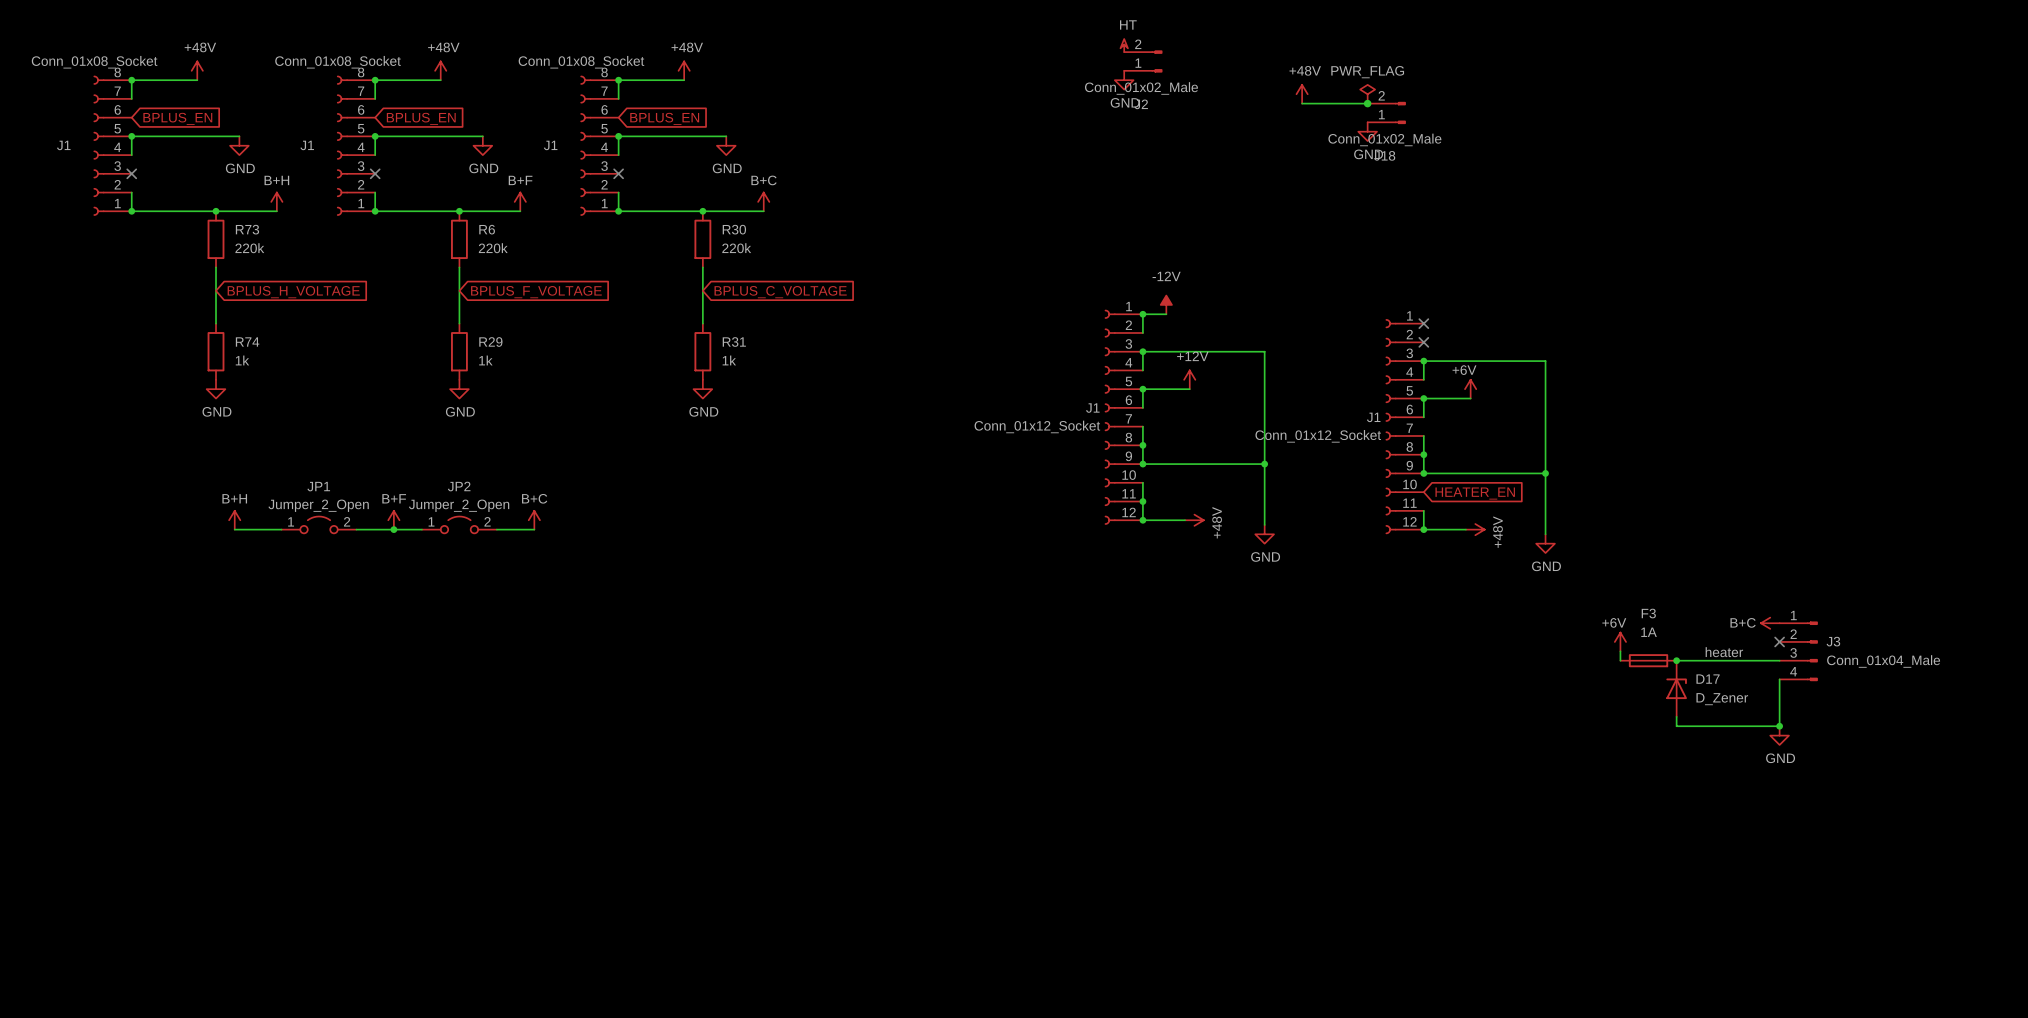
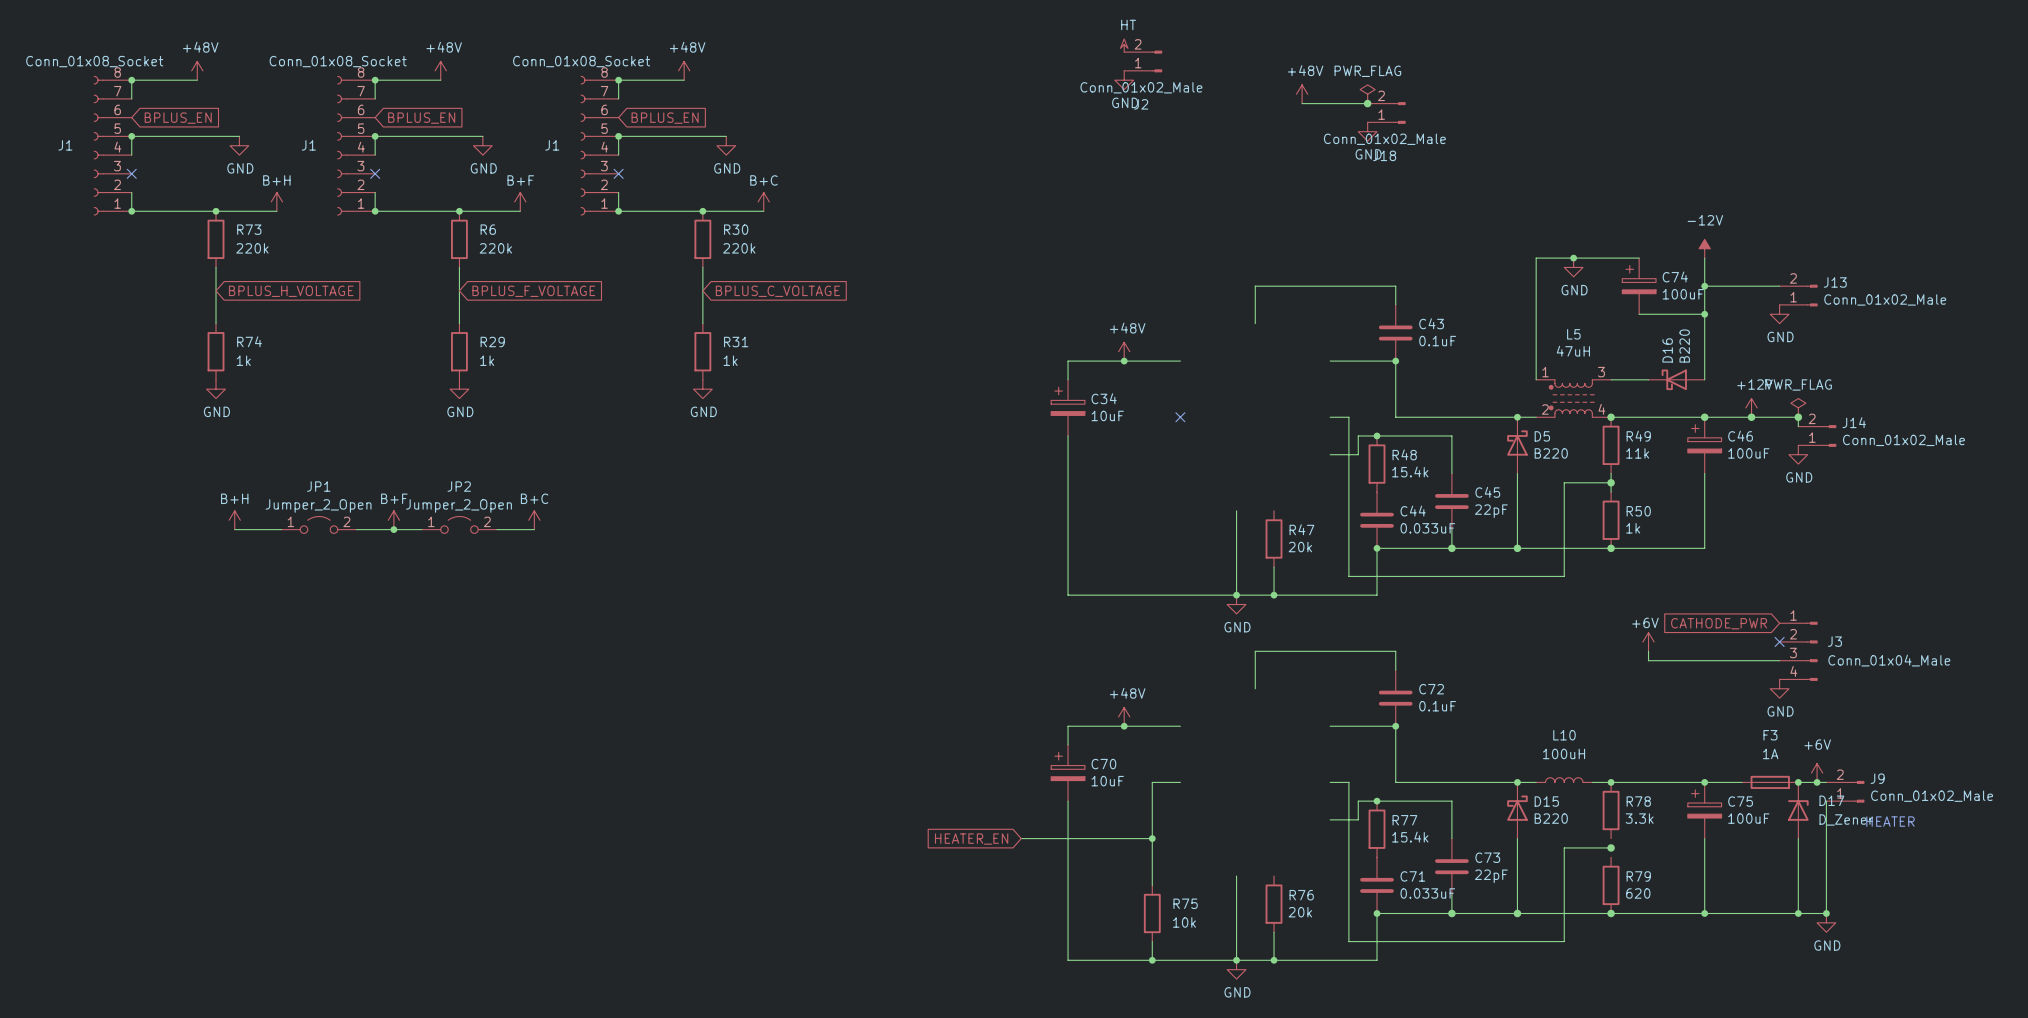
power symbol: none -> -12V (1704, 248)
junction: none -> (1573, 258)
wire: none -> (1639, 258) (1536, 258) (1536, 379)
wire: none -> (1704, 258) (1704, 379)
power symbol: none -> GND (1573, 267)
C74: none -> 100uF (1639, 286)
wire: none -> (1704, 286) (1779, 286)
junction: none -> (1704, 286)
J13: none -> Conn_01x02_Male (1798, 295)
power symbol: -12V (1166, 304) -> none
wire: none -> (1395, 304) (1395, 286) (1255, 286) (1255, 323)
junction: (1142, 314) -> none
wire: (1166, 314) (1142, 314) (1142, 332) -> none
wire: none -> (1639, 314) (1704, 314)
junction: none -> (1704, 314)
power symbol: none -> GND (1779, 314)
no-connect mark: (1423, 323) -> none
C43: none -> 0.1uF (1395, 332)
no-connect mark: (1423, 342) -> none
power symbol: none -> +48V (1124, 351)
junction: (1142, 351) -> none
junction: none -> (1124, 361)
wire: none -> (1180, 361) (1068, 361) (1068, 379)
wire: none -> (1330, 361) (1395, 361) (1395, 417) (1536, 417)
junction: none -> (1395, 361)
junction: (1423, 361) -> none
wire: (1142, 370) (1142, 351) (1264, 351) (1264, 524) -> none
power symbol: +12V (1189, 379) -> none
wire: (1423, 379) (1423, 361) (1545, 361) (1545, 534) -> none
wire: none -> (1611, 379) (1648, 379)
D16: none -> B220 (1676, 379)
junction: (1142, 389) -> none
wire: (1189, 389) (1142, 389) (1142, 407) -> none
power symbol: +6V (1470, 389) -> none
junction: (1423, 398) -> none
wire: (1470, 398) (1423, 398) (1423, 417) -> none
L5: none -> 47uH (1573, 398)
C34: none -> 10uF (1068, 407)
power symbol: none -> +12V (1751, 407)
power symbol: none -> PWR_FLAG (1798, 407)
J1: Conn_01x12_Socket (1123, 417) -> none
no-connect mark: none -> (1180, 417)
wire: none -> (1330, 417) (1348, 417) (1348, 576) (1564, 576) (1564, 482) (1611, 482)
junction: none -> (1517, 417)
wire: none -> (1611, 417) (1798, 417) (1798, 426)
junction: none -> (1611, 417)
junction: none -> (1704, 417)
junction: none -> (1751, 417)
junction: none -> (1798, 417)
wire: (1142, 426) (1142, 464) (1264, 464) -> none
J1: Conn_01x12_Socket (1404, 426) -> none
wire: none -> (1068, 435) (1068, 595) (1377, 595) (1377, 548) (1704, 548) (1704, 473)
junction: none -> (1377, 435)
wire: (1423, 435) (1423, 473) (1545, 473) -> none
J14: none -> Conn_01x02_Male (1817, 435)
junction: (1142, 445) -> none
D5: none -> B220 (1517, 445)
R49: none -> 11k (1611, 445)
C46: none -> 100uF (1704, 445)
wire: none -> (1330, 454) (1358, 454) (1358, 435) (1451, 435) (1451, 473)
junction: (1423, 454) -> none
power symbol: none -> GND (1798, 454)
junction: (1142, 464) -> none
junction: (1264, 464) -> none
R48: none -> 15.4k (1377, 464)
junction: (1423, 473) -> none
wire: none -> (1517, 473) (1517, 548)
junction: (1545, 473) -> none
wire: none -> (1611, 473) (1611, 492)
wire: (1142, 482) (1142, 520) (1185, 520) -> none
junction: none -> (1611, 482)
global label: HEATER_EN (1475, 493) -> none
junction: (1142, 501) -> none
C45: none -> 22pF (1451, 501)
wire: none -> (1236, 510) (1236, 595)
wire: (1423, 510) (1423, 529) (1465, 529) -> none
junction: (1142, 520) -> none
power symbol: +48V (1194, 520) -> none
C44: none -> 0.033uF (1377, 520)
R50: none -> 1k (1611, 520)
junction: (1423, 529) -> none
wire: none -> (1451, 529) (1451, 548)
power symbol: +48V (1475, 529) -> none
power symbol position: GND (1264, 534) -> GND (1236, 604)
R47: none -> 20k (1274, 538)
power symbol: GND (1545, 543) -> none
junction: none -> (1377, 548)
junction: none -> (1451, 548)
junction: none -> (1517, 548)
junction: none -> (1611, 548)
wire: none -> (1274, 567) (1274, 595)
junction: none -> (1236, 595)
junction: none -> (1274, 595)
power symbol: B+C (1770, 623) -> none
global label: none -> CATHODE_PWR (1719, 623)
power symbol position: +6V (1620, 641) -> +6V (1648, 641)
wire: (1620, 651) (1620, 660) -> none
label: heater (1724, 652) -> none
F3 position: (1648, 660) -> (1770, 782)
junction: (1676, 660) -> none
wire: none -> (1395, 670) (1395, 651) (1255, 651) (1255, 688)
wire: (1779, 679) (1779, 726) (1676, 726) (1676, 716) -> none
D17 position: (1676, 688) -> (1798, 810)
C72: none -> 0.1uF (1395, 698)
power symbol: none -> +48V (1124, 716)
junction: none -> (1124, 726)
wire: none -> (1180, 726) (1068, 726) (1068, 744)
wire: none -> (1330, 726) (1395, 726) (1395, 782) (1536, 782)
junction: none -> (1395, 726)
junction: (1779, 726) -> none
power symbol position: GND (1779, 735) -> GND (1779, 688)
C70: none -> 10uF (1068, 773)
power symbol: none -> +6V (1817, 773)
L10: none -> 100uH (1564, 780)
wire: none -> (1180, 782) (1152, 782) (1152, 885)
wire: none -> (1330, 782) (1348, 782) (1348, 941) (1564, 941) (1564, 847) (1611, 847)
junction: none -> (1517, 782)
wire: none -> (1592, 782) (1742, 782)
junction: none -> (1611, 782)
junction: none -> (1704, 782)
wire: none -> (1798, 782) (1826, 782)
junction: none -> (1798, 782)
junction: none -> (1817, 782)
J9: none -> Conn_01x02_Male (1845, 791)
wire: none -> (1068, 801) (1068, 960) (1377, 960) (1377, 913) (1826, 913) (1826, 801)
junction: none -> (1377, 801)
D15: none -> B220 (1517, 810)
R78: none -> 3.3k (1611, 810)
C75: none -> 100uF (1704, 810)
wire: none -> (1330, 819) (1358, 819) (1358, 801) (1451, 801) (1451, 838)
text: none -> HEATER (1890, 821)
R77: none -> 15.4k (1377, 829)
wire: none -> (1021, 838) (1152, 838)
junction: none -> (1152, 838)
wire: none -> (1517, 838) (1517, 913)
wire: none -> (1704, 838) (1704, 913)
wire: none -> (1798, 838) (1798, 913)
global label: none -> HEATER_EN (971, 839)
junction: none -> (1611, 847)
C73: none -> 22pF (1451, 866)
wire: none -> (1236, 876) (1236, 960)
C71: none -> 0.033uF (1377, 885)
R79: none -> 620 (1611, 885)
wire: none -> (1451, 894) (1451, 913)
R76: none -> 20k (1274, 904)
R75: none -> 10k (1152, 913)
junction: none -> (1377, 913)
junction: none -> (1451, 913)
junction: none -> (1517, 913)
junction: none -> (1611, 913)
junction: none -> (1704, 913)
junction: none -> (1798, 913)
junction: none -> (1826, 913)
power symbol: none -> GND (1826, 922)
wire: none -> (1274, 932) (1274, 960)
wire: none -> (1152, 941) (1152, 960)
junction: none -> (1152, 960)
junction: none -> (1236, 960)
junction: none -> (1274, 960)
power symbol: none -> GND (1236, 969)

